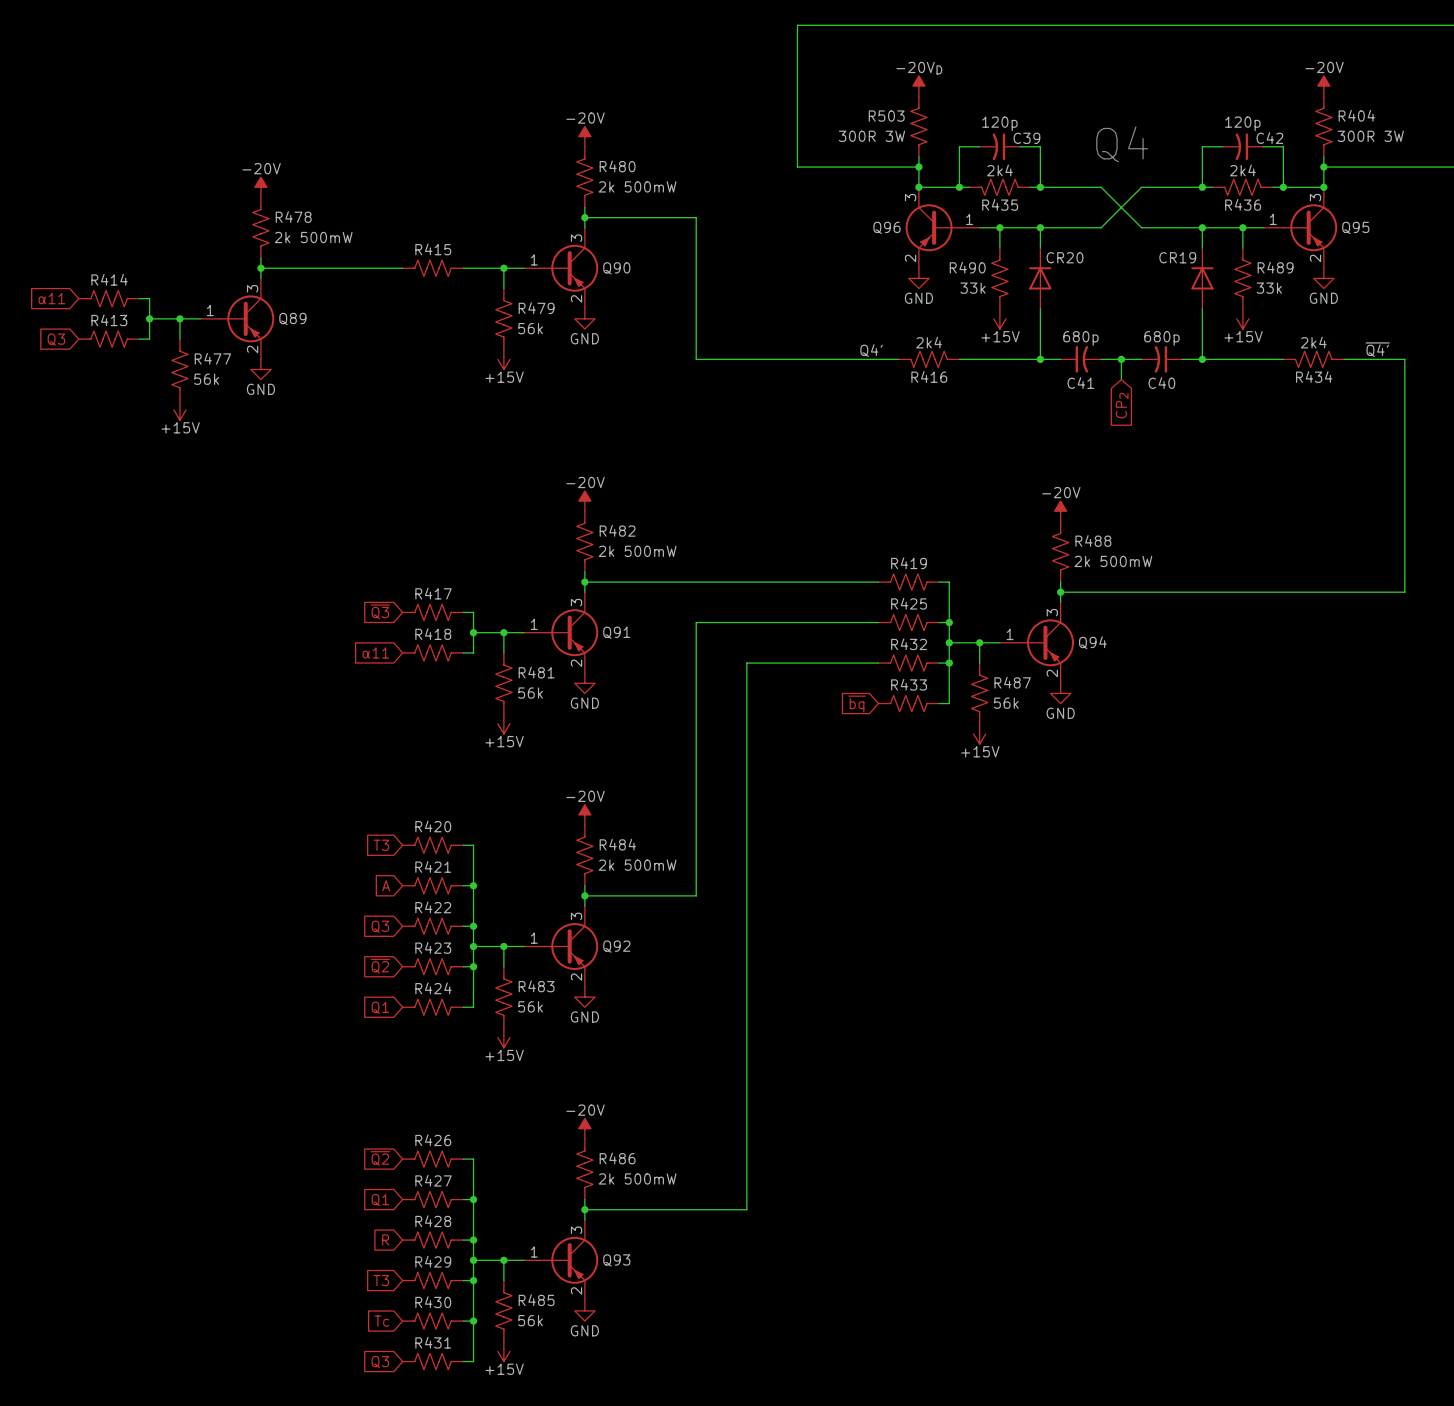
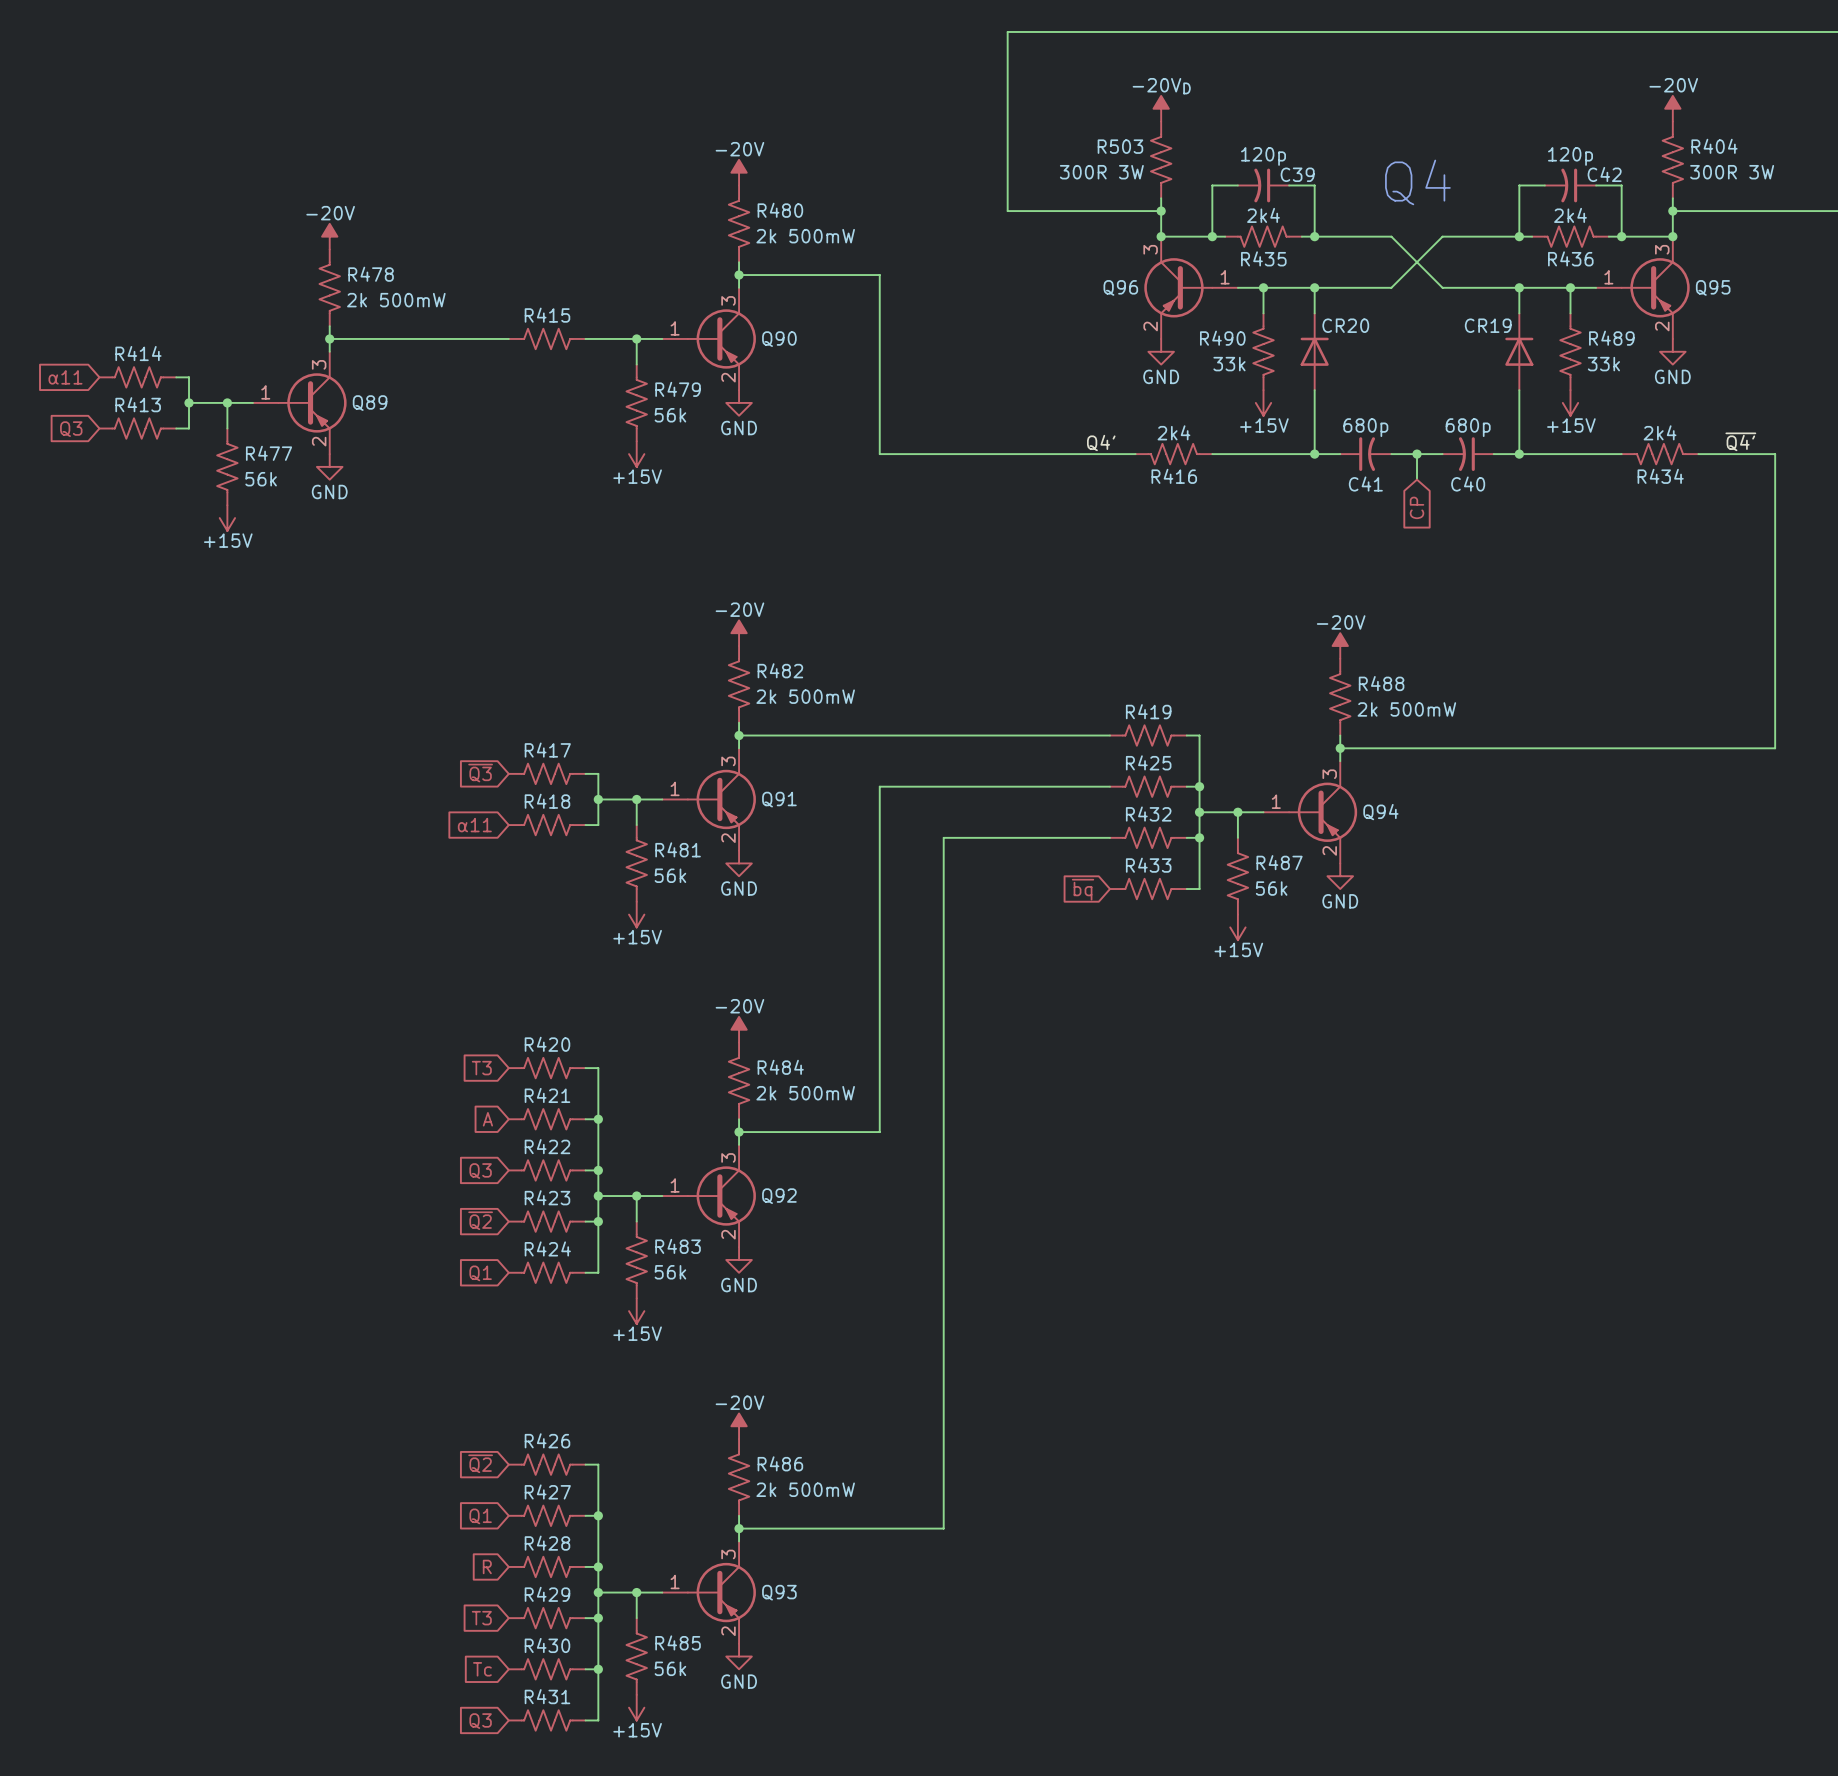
global label: CP2 (1122, 405) -> CP (1417, 507)

